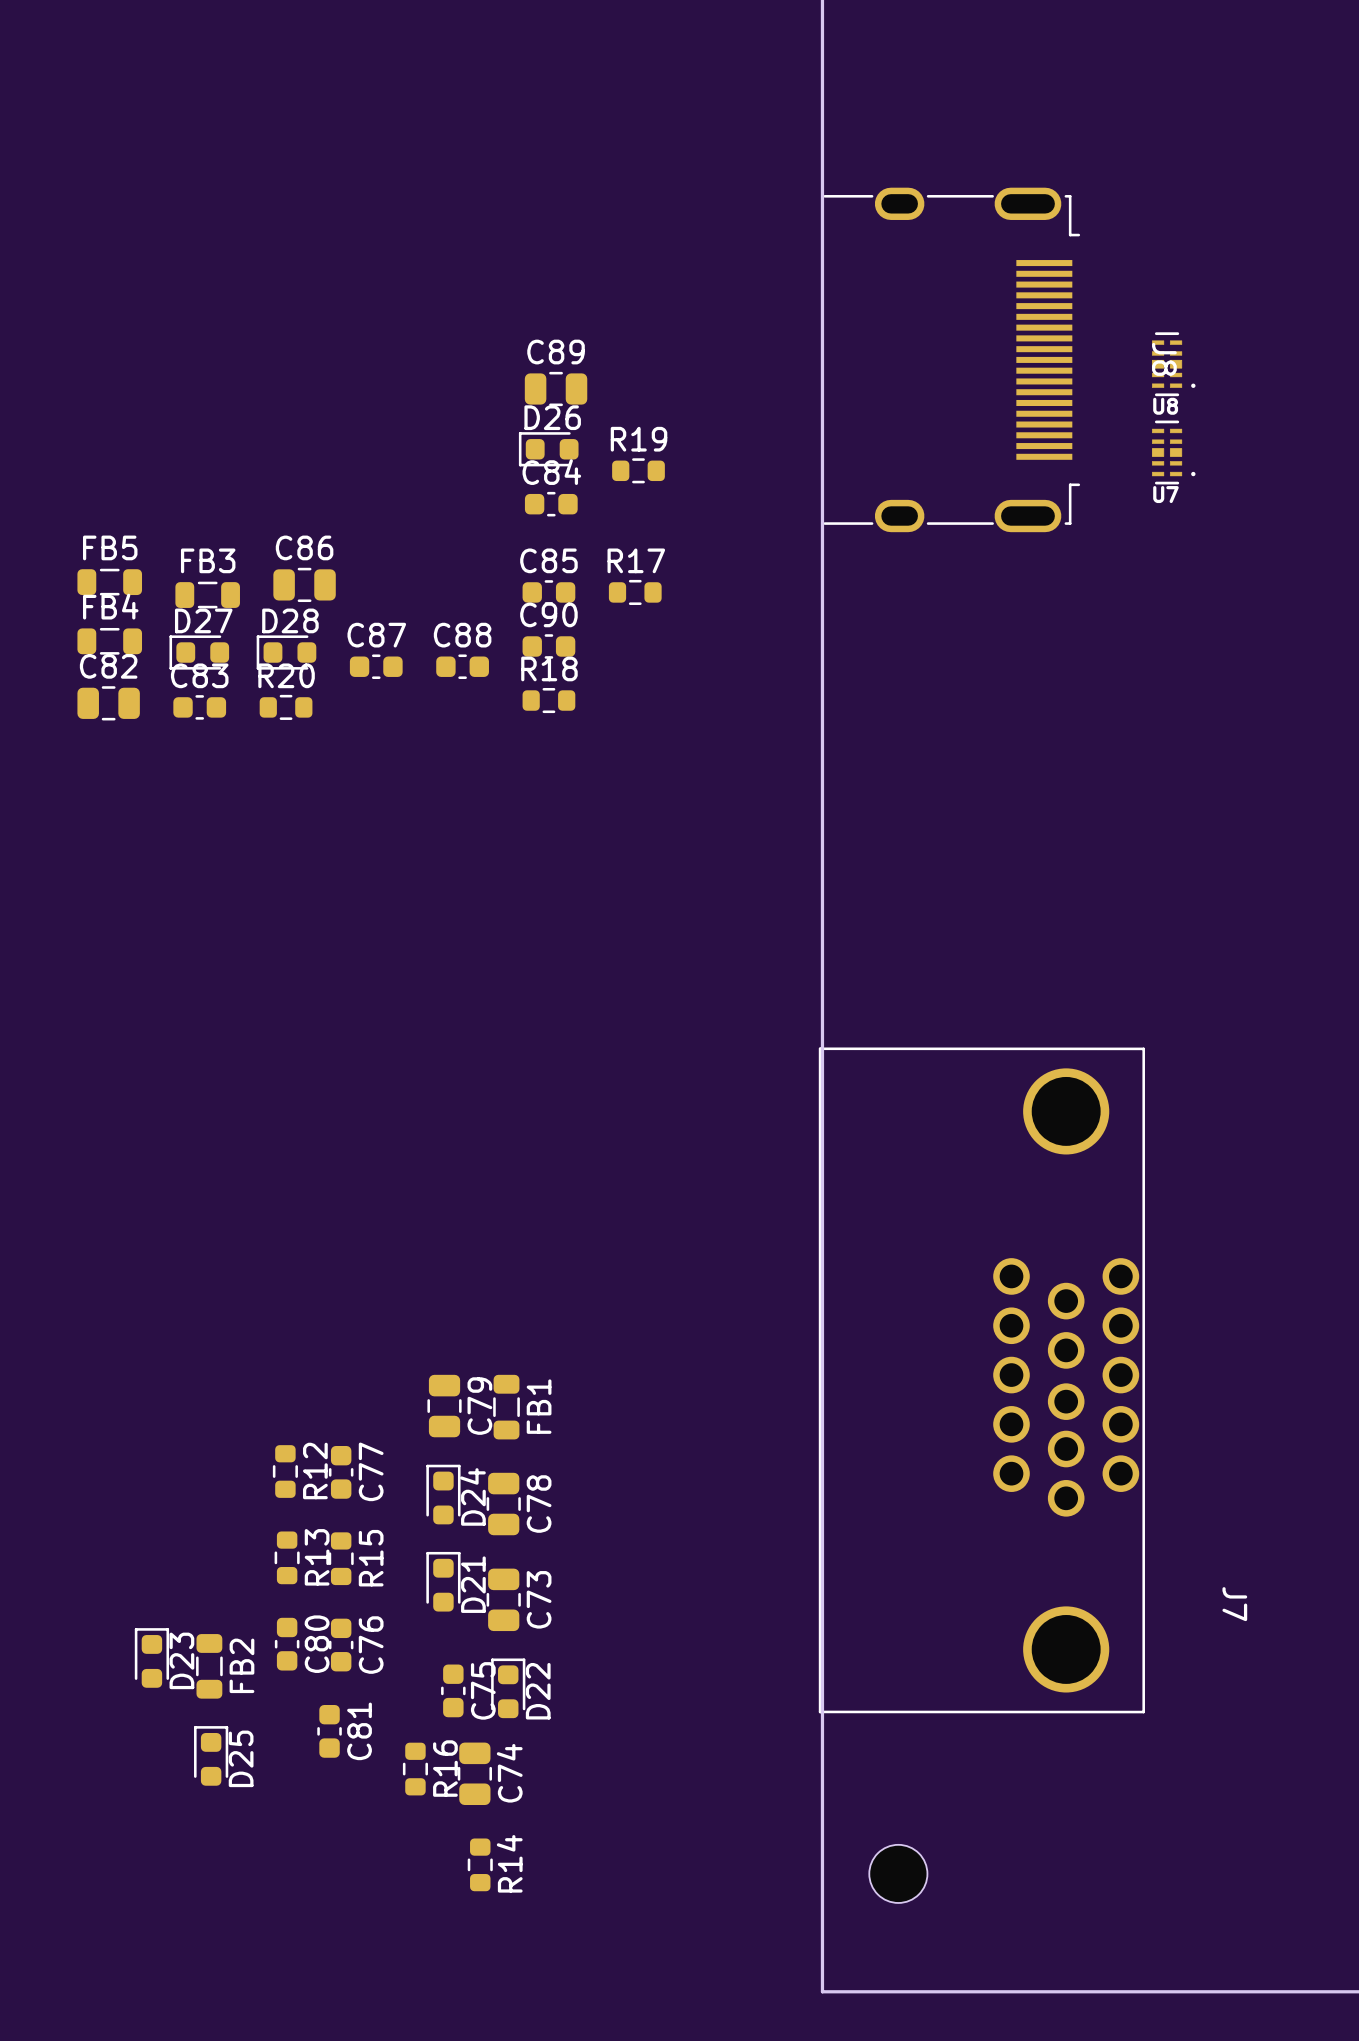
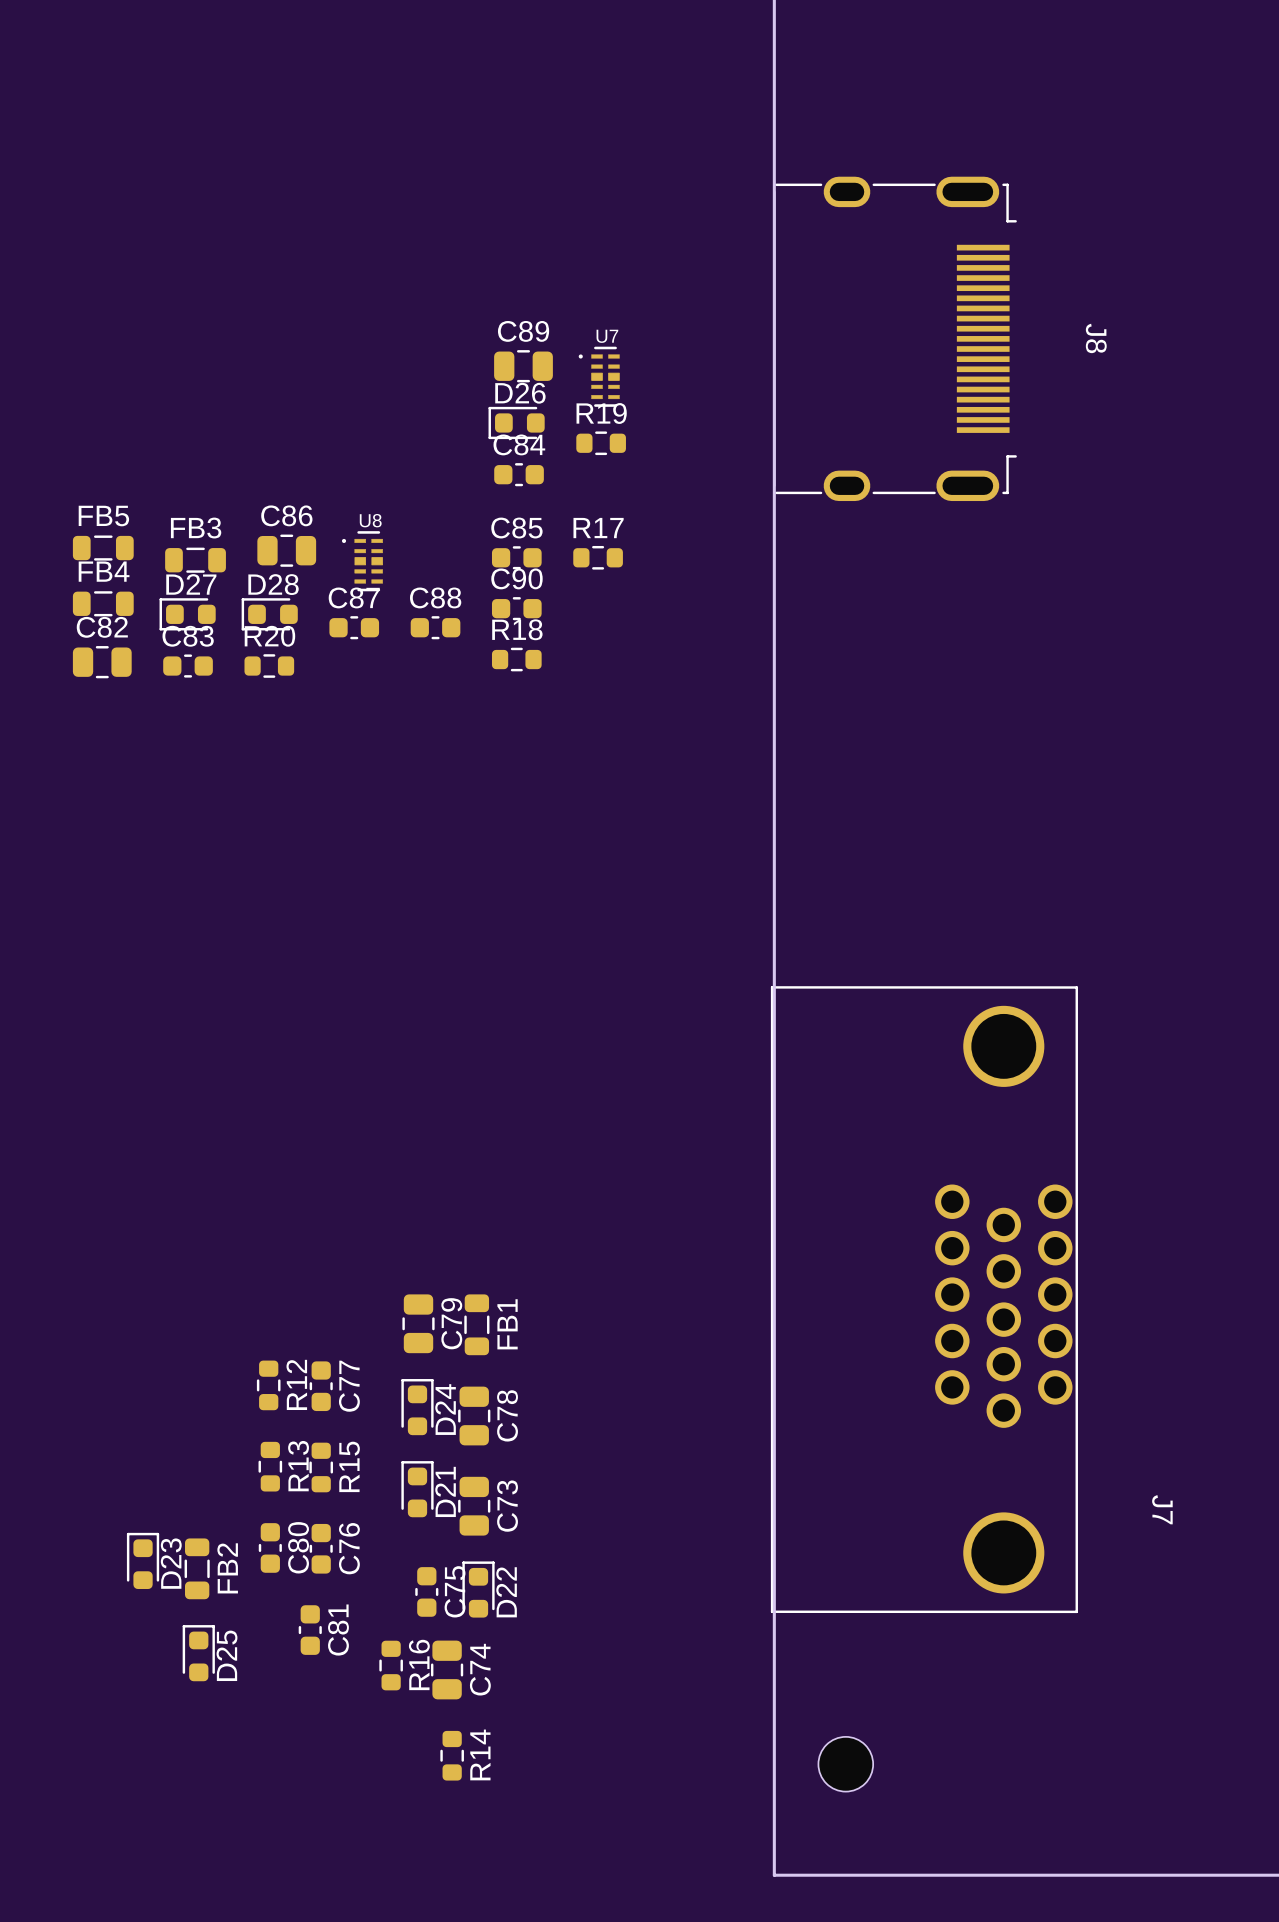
U8 rotation: 0° (1173, 364) -> 180° (362, 561)
U8 position: (1173, 364) -> (362, 561)
U7 rotation: 0° (1173, 452) -> 180° (599, 376)
U7 position: (1173, 452) -> (599, 376)

